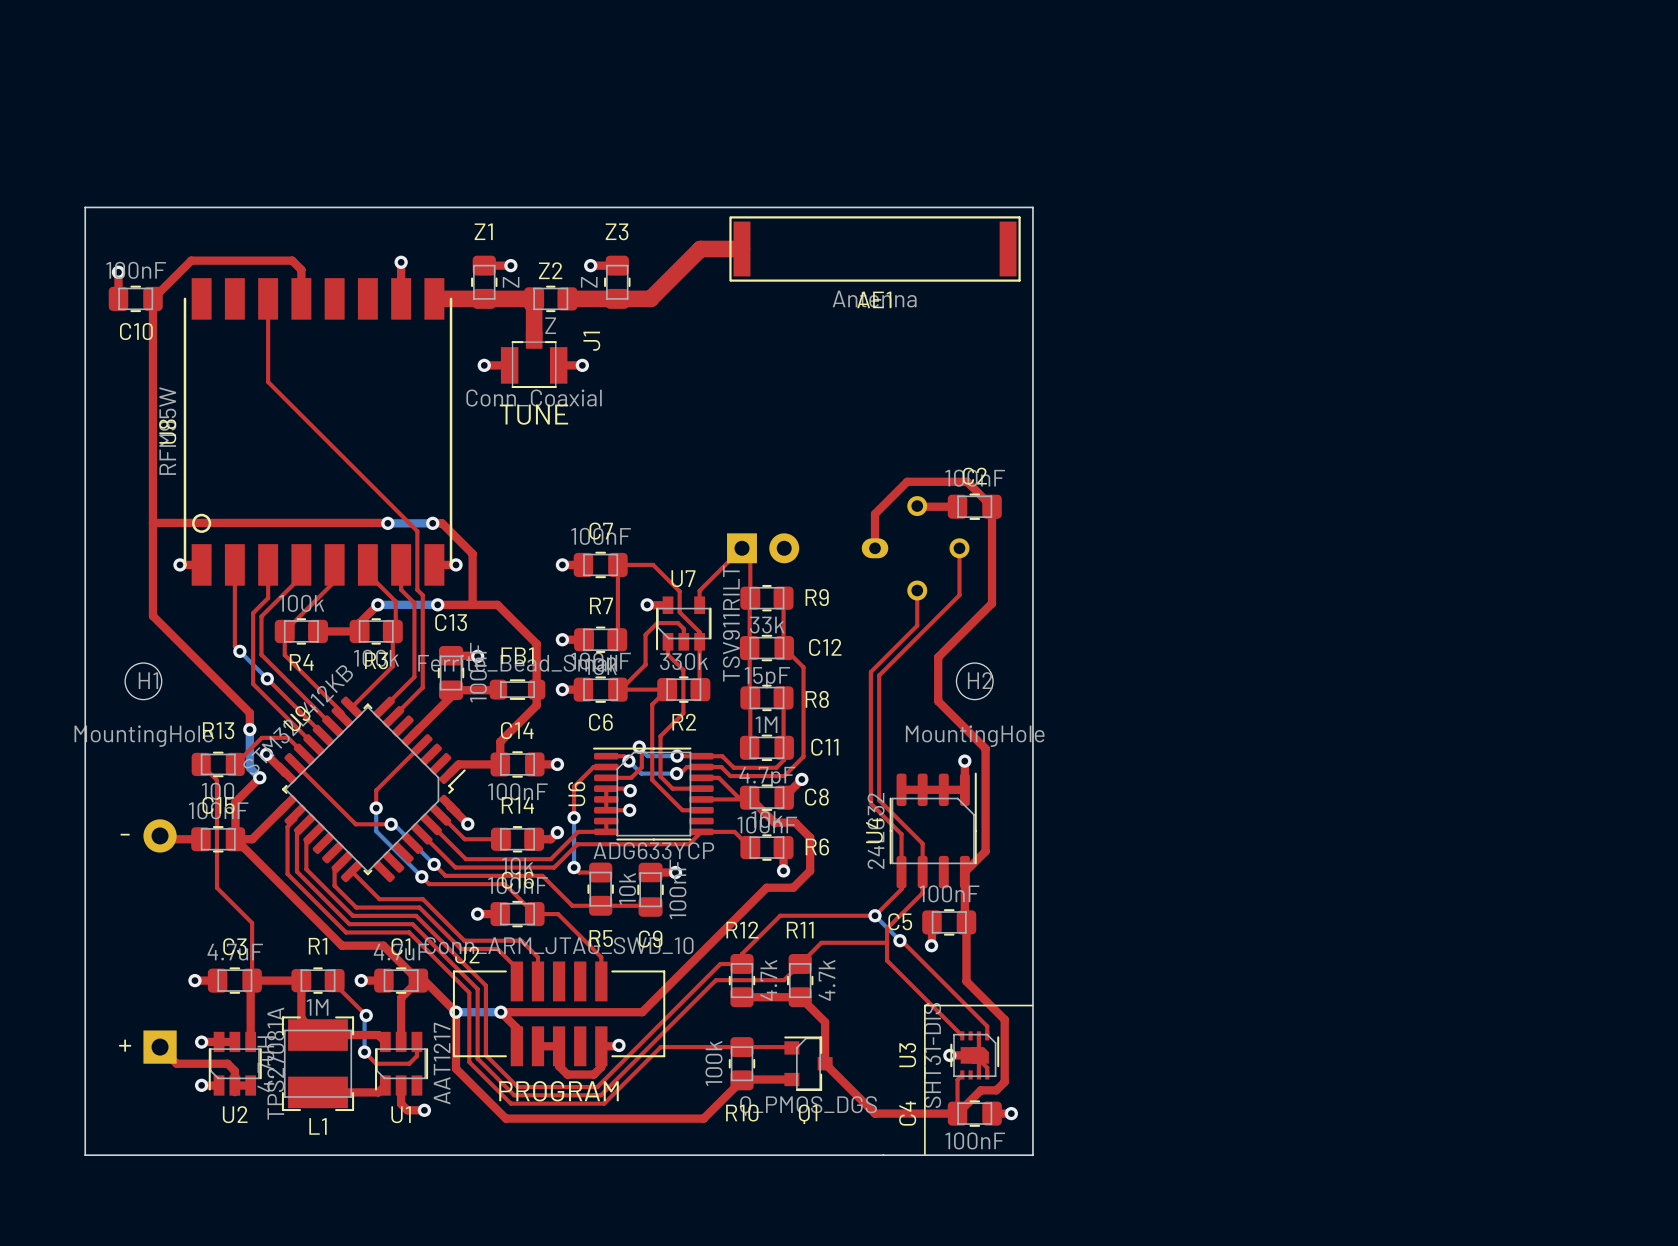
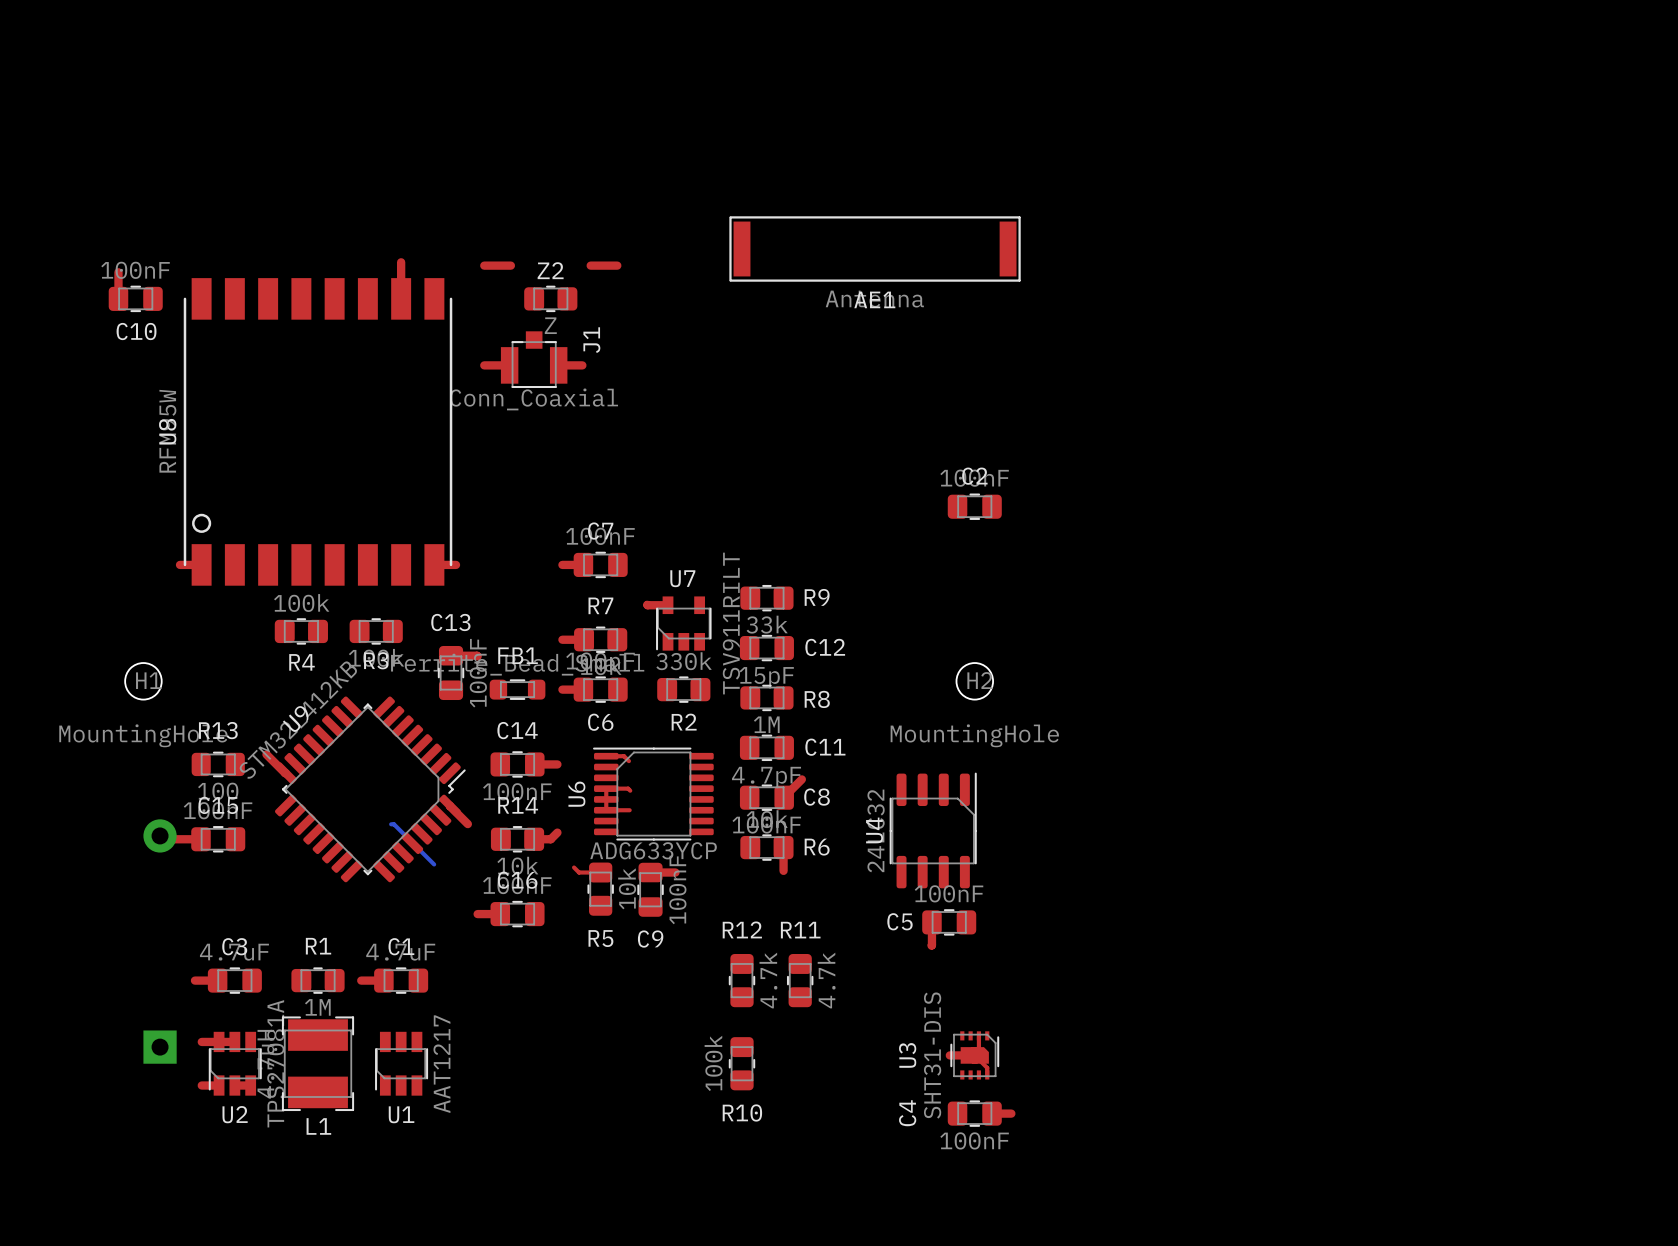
board edge: (85, 207) (85, 1155) (1032, 1155) (1032, 207) (85, 207) -> none
top track: (742, 249) (700, 249) (650, 298) (567, 298) -> none
via: (401, 262) -> none
via: (510, 265) -> none
via: (590, 265) -> none
via: (118, 272) -> none
Z1: Z (484, 282) -> none
Z3: Z (617, 282) -> none
top track: (268, 298) (268, 382) (417, 531) (417, 589) (422, 595) (422, 687) (393, 716) -> none
top track: (301, 298) (301, 269) (292, 260) (191, 260) (152, 298) (152, 616) (249, 712) (249, 729) -> none
top track: (434, 298) (534, 298) (534, 340) -> none
via: (484, 365) -> none
via: (582, 365) -> none
text: TUNE (533, 414) -> none
top track: (917, 506) (957, 506) (957, 511) -> none
top track: (152, 522) (387, 523) -> none
bottom track: (387, 523) (432, 523) -> none
via: (387, 523) -> none
top track: (432, 523) (442, 523) (472, 553) (472, 604) -> none
via: (432, 523) -> none
part: (763, 548) -> none
top track: (875, 548) (875, 513) (907, 481) (967, 481) (992, 506) (992, 603) (938, 657) (938, 701) (985, 748) (985, 851) (964, 872) (966, 981) (1004, 1019) (1004, 1082) (996, 1090) (980, 1090) (957, 1113) -> none
part: (915, 548) -> none
top track: (959, 548) (959, 595) (879, 675) (879, 800) (922, 843) (922, 893) (887, 928) (887, 960) (962, 1035) -> none
via: (180, 564) -> none
top track: (234, 564) (234, 646) (239, 651) -> none
top track: (268, 564) (268, 598) (253, 613) (253, 684) (314, 745) -> none
top track: (301, 564) (301, 576) (261, 616) (261, 654) (332, 726) -> none
top track: (334, 564) (334, 581) (284, 631) (284, 655) (342, 712) (342, 716) -> none
top track: (367, 564) (367, 573) (395, 601) (395, 628) (392, 631) (392, 666) (351, 707) -> none
top track: (401, 564) (401, 589) (414, 603) (414, 676) (384, 707) -> none
via: (456, 564) -> none
via: (562, 564) -> none
top track: (917, 590) (917, 625) (870, 672) (870, 803) (901, 834) (901, 889) (875, 915) (780, 915) (742, 953) (742, 963) (720, 963) (597, 1087) (517, 1087) (485, 1055) (485, 985) (416, 915) (352, 915) (306, 869) (306, 841) (314, 833) -> none
top track: (783, 598) (783, 647) (803, 667) (803, 756) (784, 776) (730, 776) (721, 767) (686, 767) (680, 773) (676, 773) -> none
top track: (377, 604) (359, 623) (359, 631) (318, 631) -> none
bottom track: (377, 604) (437, 604) -> none
via: (377, 604) -> none
top track: (437, 604) (497, 604) (536, 643) (536, 705) (500, 741) (500, 764) (458, 764) (449, 773) -> none
via: (437, 604) -> none
via: (647, 604) -> none
top track: (699, 605) (699, 590) (742, 548) (750, 556) (749, 747) -> none
via: (562, 639) -> none
top track: (617, 639) (617, 564) (653, 564) (679, 591) (679, 612) (699, 632) (700, 689) -> none
top track: (668, 641) (668, 654) (683, 670) (683, 713) (660, 736) (660, 776) (672, 788) (701, 788) -> none
top track: (683, 641) (683, 628) (678, 623) (657, 623) (645, 634) (645, 664) (620, 689) -> none
bottom track: (239, 651) (267, 678) -> none
via: (239, 651) -> none
via: (477, 656) -> none
top track: (267, 678) (323, 735) -> none
via: (267, 678) -> none
top track: (498, 689) (451, 690) (451, 696) (412, 735) -> none
via: (562, 689) -> none
top track: (617, 689) (667, 689) (652, 704) (652, 779) (682, 810) (701, 810) -> none
top track: (783, 697) (784, 759) (776, 767) (733, 767) (722, 756) (677, 756) -> none
bottom track: (249, 729) (249, 767) (259, 777) -> none
via: (249, 729) -> none
top track: (421, 745) (376, 790) (376, 808) -> none
top track: (639, 747) (641, 749) (641, 767) (631, 777) (606, 777) -> none
bottom track: (639, 747) (647, 756) (677, 756) -> none
via: (639, 747) -> none
via: (266, 754) -> none
top track: (304, 754) (288, 737) (261, 737) (235, 764) -> none
via: (677, 756) -> none
bottom track: (628, 761) (641, 773) (676, 773) -> none
via: (628, 761) -> none
top track: (964, 761) (964, 789) (901, 789) -> none
via: (964, 761) -> none
top track: (295, 763) (355, 824) (391, 824) -> none
top track: (201, 764) (216, 780) (216, 887) (252, 923) (252, 980) -> none
via: (557, 764) -> none
top track: (606, 767) (593, 767) (574, 786) (574, 817) -> none
via: (676, 773) -> none
top track: (259, 777) (235, 802) (235, 841) -> none
via: (259, 777) -> none
top track: (701, 777) (718, 777) (738, 797) (749, 797) -> none
via: (801, 779) -> none
via: (630, 790) -> none
top track: (749, 797) (774, 822) (795, 822) (810, 837) (810, 870) (793, 887) (766, 887) (642, 1012) (500, 1012) (516, 1028) (516, 1046) -> none
top track: (749, 797) (747, 799) (701, 799) -> none
top track: (285, 805) (252, 839) (235, 839) (341, 945) (383, 945) (418, 980) -> none
bottom track: (376, 808) (376, 831) (421, 876) -> none
via: (376, 808) -> none
via: (629, 810) -> none
top track: (295, 814) (295, 819) (287, 826) (287, 874) (346, 932) (409, 932) (469, 992) (469, 1062) (510, 1103) (604, 1103) (660, 1047) (791, 1047) -> none
top track: (440, 814) (464, 839) (500, 839) -> none
bottom track: (574, 817) (574, 867) -> none
via: (574, 817) -> none
top track: (606, 821) (606, 831) (578, 831) (550, 859) (465, 859) (431, 824) -> none
top track: (304, 824) (296, 832) (296, 871) (349, 924) (412, 924) (477, 989) (477, 1058) (514, 1095) (600, 1095) (715, 980) (783, 980) (821, 942) (887, 942) -> none
via: (391, 824) -> none
via: (467, 824) -> none
via: (557, 832) -> none
top track: (421, 833) (455, 867) (554, 867) (577, 844) (689, 844) (701, 831) (734, 831) (750, 847) -> none
text: - (125, 834) -> none
top track: (342, 861) (334, 869) (334, 885) (356, 907) (419, 907) (461, 949) (497, 949) (516, 968) (516, 981) -> none
top track: (434, 864) (445, 875) (542, 875) (572, 905) (650, 907) -> none
via: (434, 864) -> none
via: (574, 867) -> none
via: (783, 870) -> none
top track: (351, 871) (379, 899) (422, 899) (464, 940) (521, 940) (537, 957) (537, 981) -> none
via: (675, 872) -> none
top track: (421, 876) (429, 884) (504, 884) (534, 914) (558, 914) (601, 957) (601, 981) -> none
via: (421, 876) -> none
via: (477, 914) -> none
bottom track: (875, 915) (899, 940) -> none
via: (875, 915) -> none
top track: (899, 940) (987, 1026) (987, 1035) -> none
via: (899, 940) -> none
via: (931, 945) -> none
via: (194, 980) -> none
top track: (252, 980) (250, 1035) -> none
top track: (252, 980) (301, 980) (301, 1018) (318, 1035) (378, 1035) (385, 1041) -> none
top track: (334, 980) (334, 983) (366, 1015) -> none
via: (361, 980) -> none
top track: (418, 980) (424, 980) (456, 1012) (456, 1068) (505, 1118) (703, 1118) (742, 1079) (791, 1079) -> none
top track: (418, 980) (401, 997) (401, 1035) -> none
top track: (742, 997) (800, 997) (825, 1022) (825, 1063) (875, 1113) (957, 1113) -> none
line: (1032, 1005) (924, 1005) (924, 1155) -> none
bottom track: (456, 1012) (500, 1012) -> none
via: (456, 1012) -> none
via: (500, 1012) -> none
J2: Conn_ARM_JTAG_SWD_10 (559, 1013) -> none
bottom track: (366, 1015) (364, 1017) (364, 1052) -> none
via: (366, 1015) -> none
top track: (416, 1035) (416, 1056) (409, 1063) (376, 1063) (364, 1052) -> none
via: (201, 1042) -> none
text: + (125, 1045) -> none
top track: (618, 1045) (601, 1046) (601, 1067) (593, 1074) (567, 1074) (559, 1066) (559, 1046) (537, 1046) -> none
via: (618, 1045) -> none
top track: (160, 1047) (176, 1063) (227, 1063) (234, 1070) (234, 1092) -> none
via: (364, 1052) -> none
via: (949, 1055) -> none
top track: (978, 1059) (978, 1074) -> none
Q1: Q_PMOS_DGS (808, 1063) -> none
top track: (962, 1074) (957, 1079) (957, 1113) -> none
via: (201, 1085) -> none
top track: (385, 1085) (378, 1092) (318, 1092) -> none
top track: (401, 1085) (401, 1103) (407, 1110) (424, 1110) -> none
text: PROGRAM (559, 1091) -> none
via: (424, 1110) -> none
via: (1011, 1113) -> none

